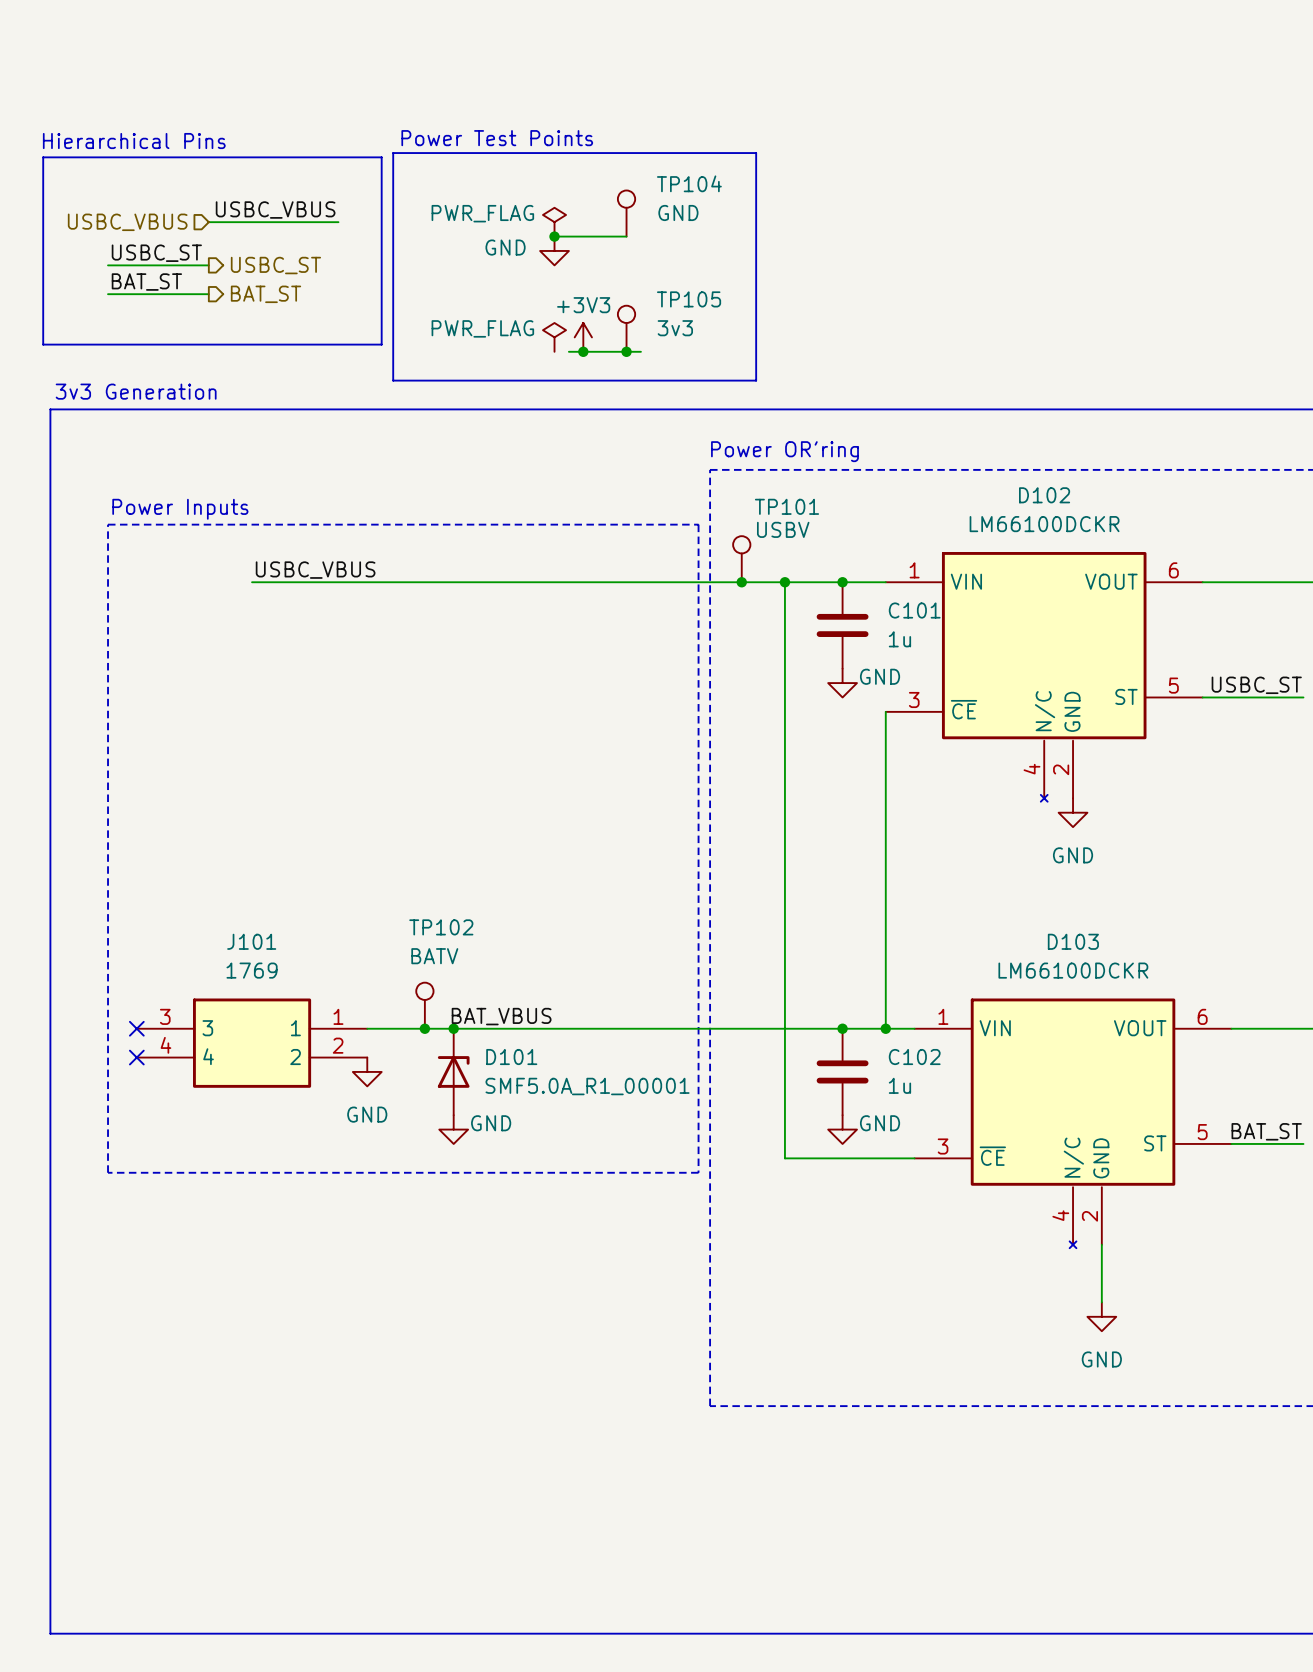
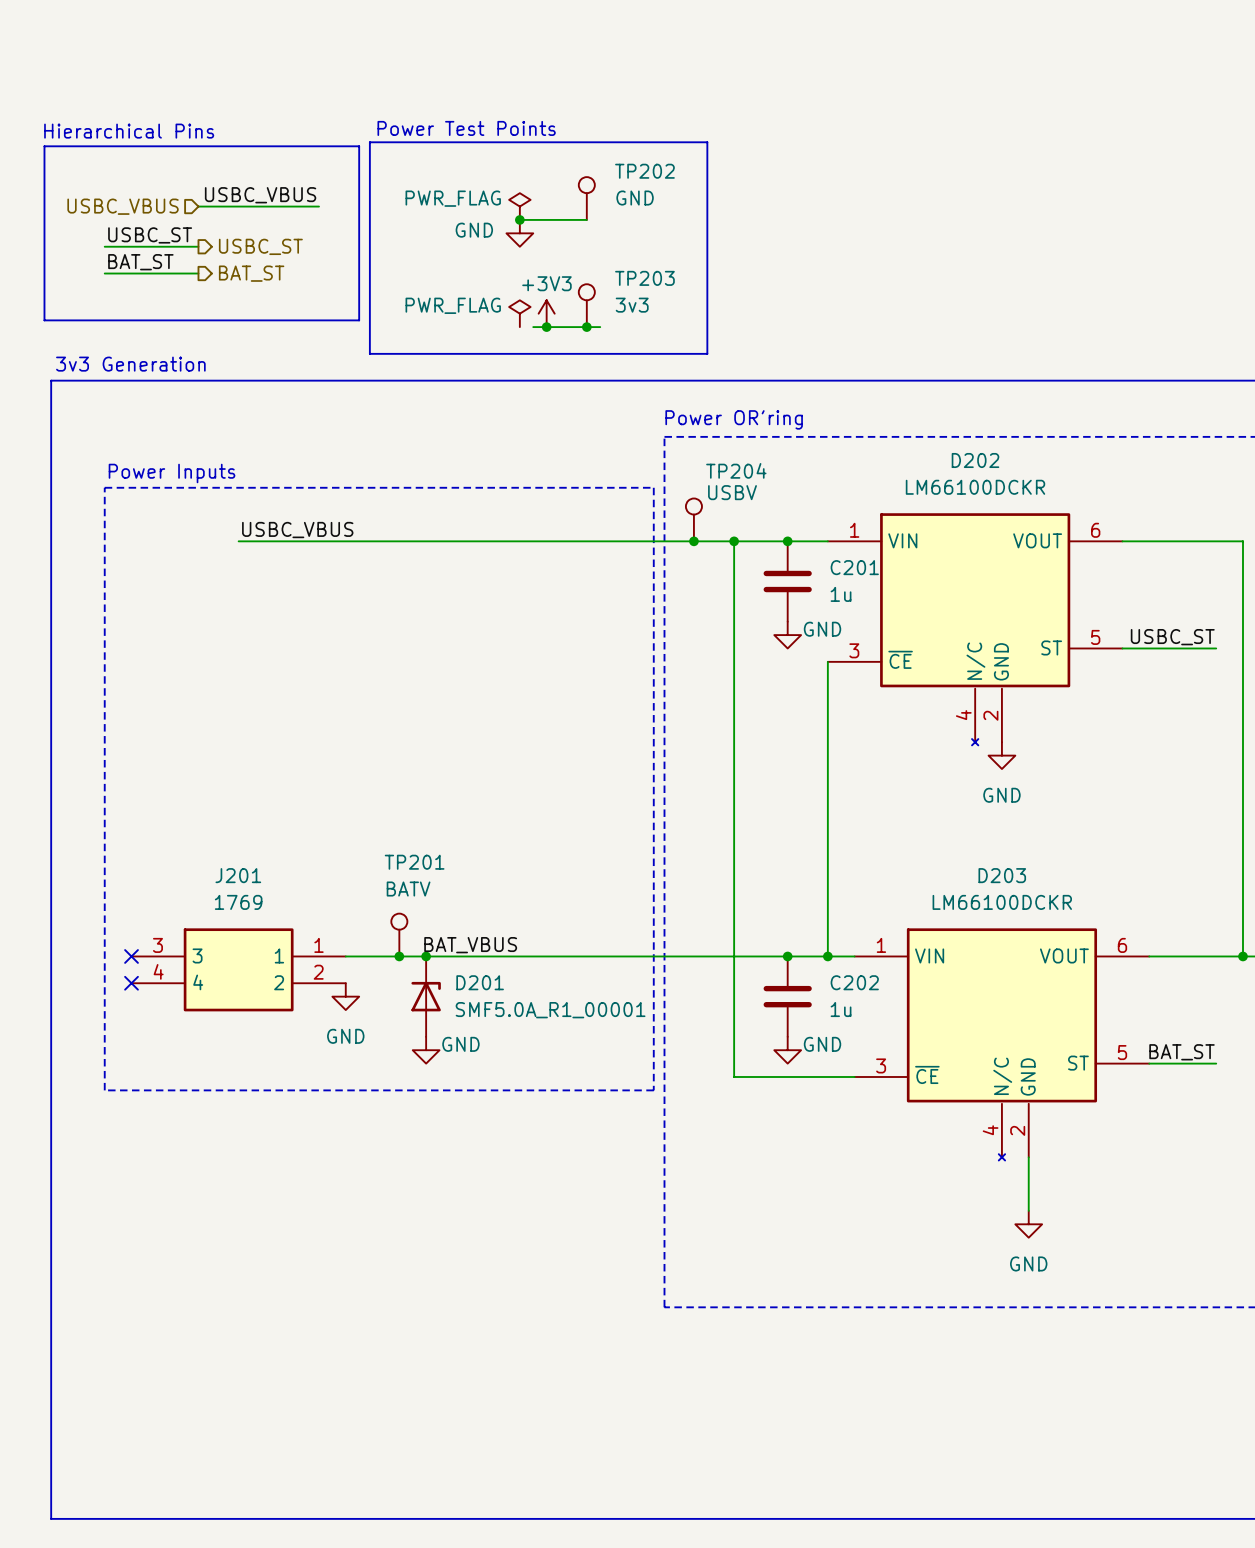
TP104 name: TP104 (689, 183) -> TP202 (644, 171)
TP105 name: TP105 (689, 299) -> TP203 (644, 278)
D102 name: D102 (1044, 495) -> D202 (975, 460)
TP101 name: TP101 (786, 506) -> TP204 (736, 470)
C101 name: C101 (914, 610) -> C201 (854, 567)
TP102 name: TP102 (441, 927) -> TP201 (414, 862)
J101 name: J101 (251, 941) -> J201 (238, 875)
D103 name: D103 (1073, 941) -> D203 (1002, 875)
D101 name: D101 (511, 1057) -> D201 (480, 982)
C102 name: C102 (914, 1057) -> C202 (854, 982)

